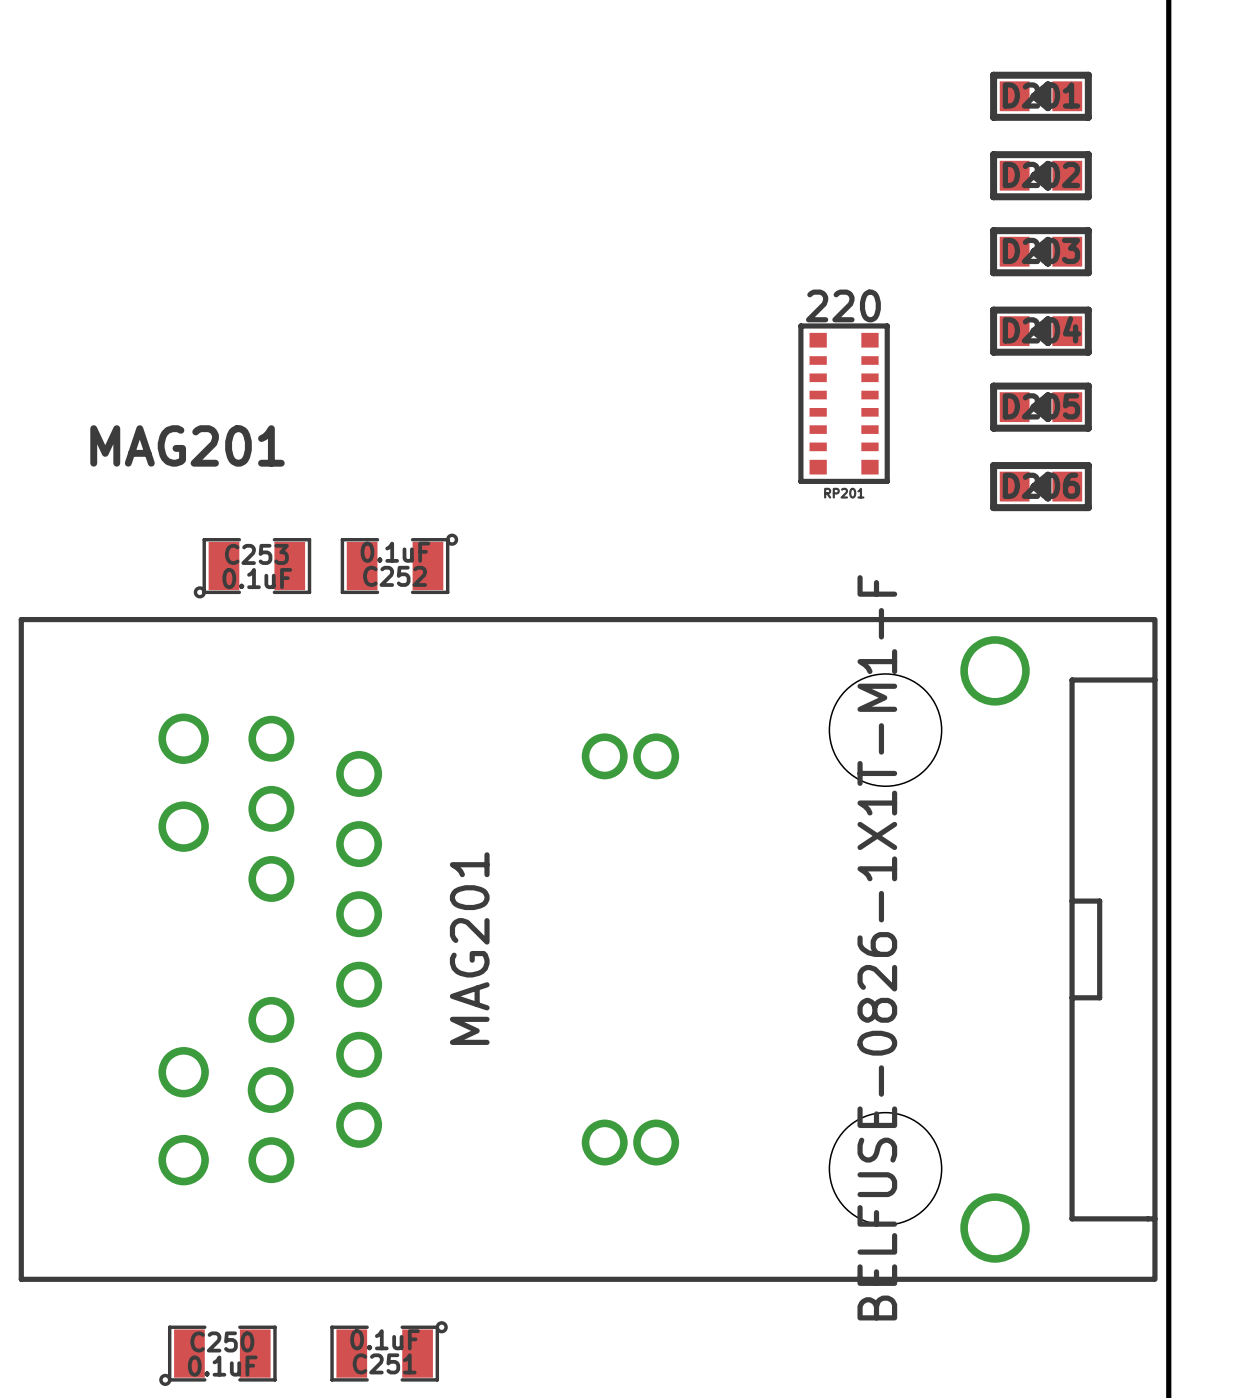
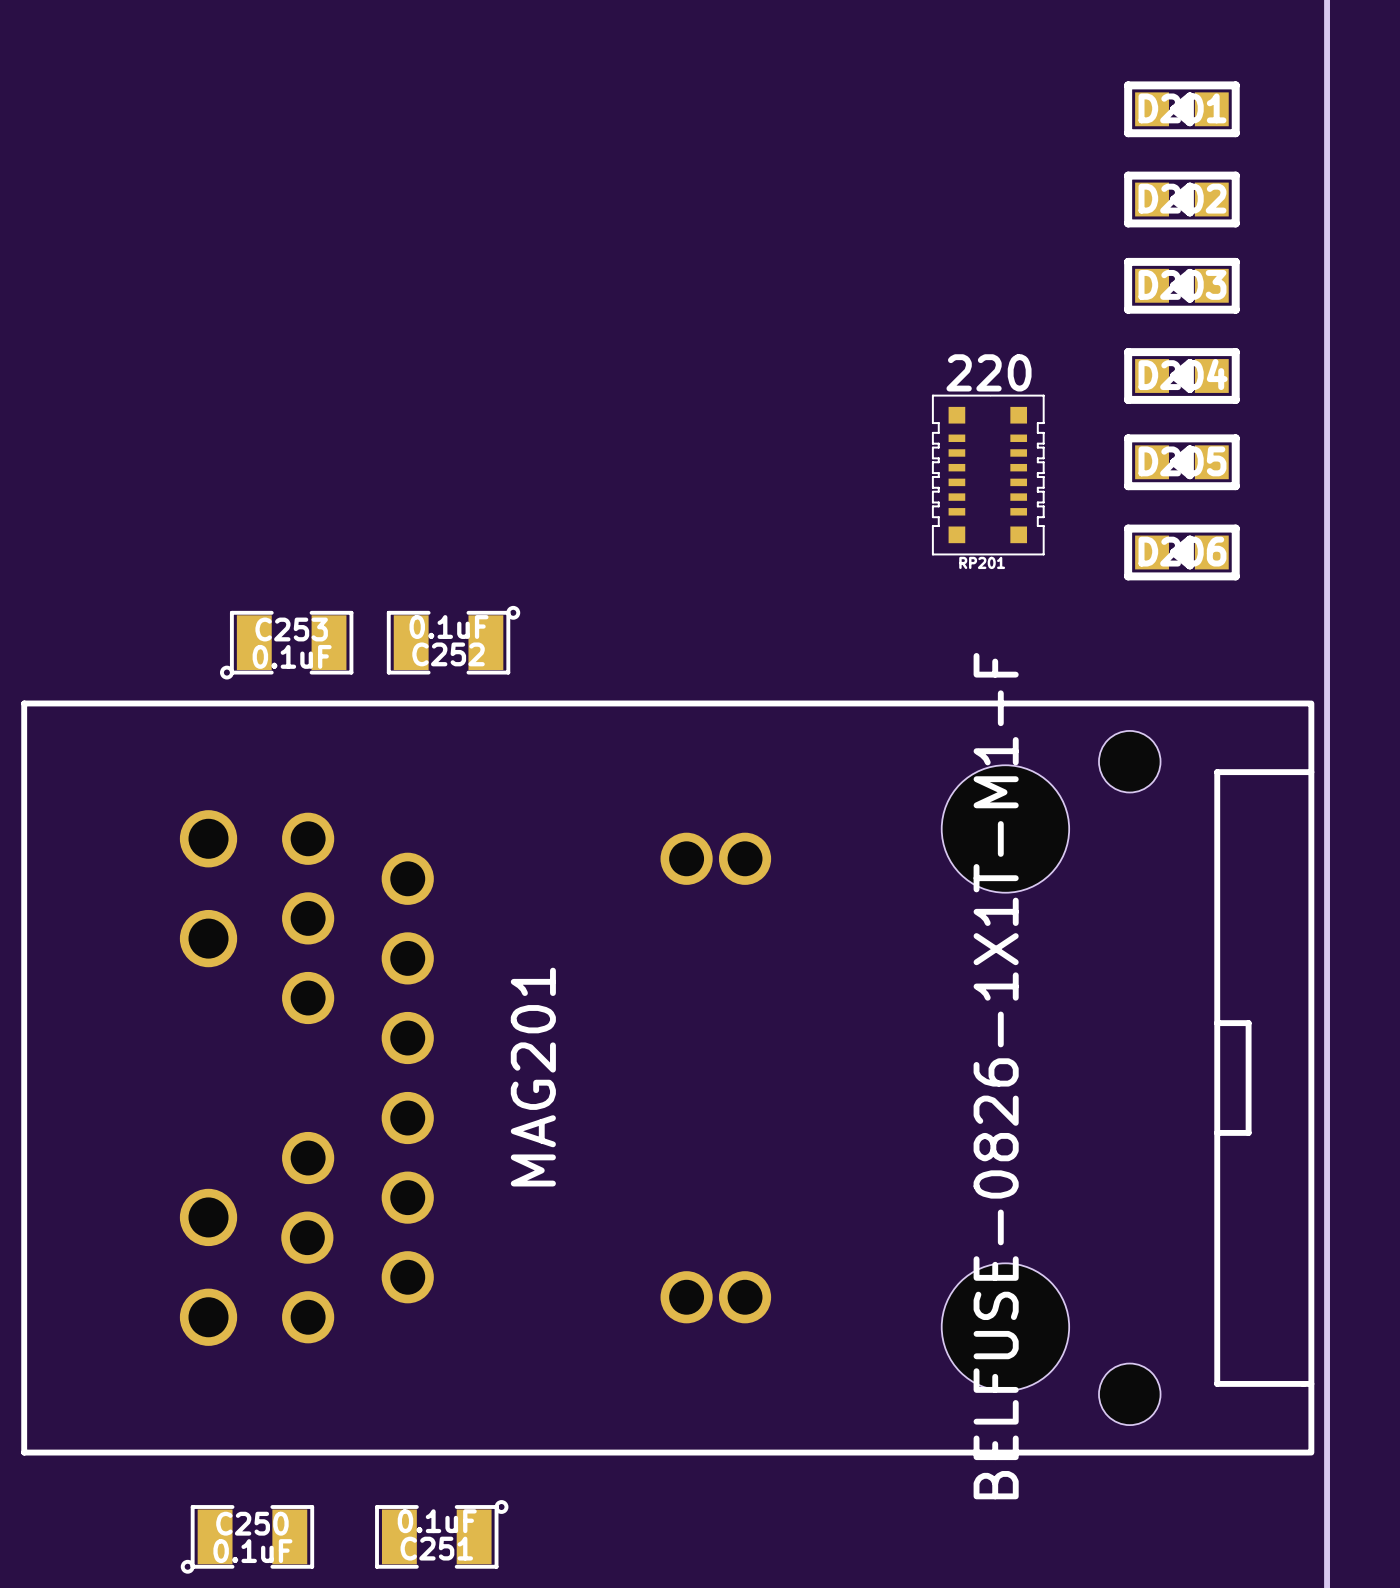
RP201 footprint: [798, 323, 890, 485] -> [931, 394, 1045, 556]
text: MAG201 (187, 445) -> none
MAG201 footprint: [18, 616, 1158, 1282] -> [21, 700, 1315, 1456]

